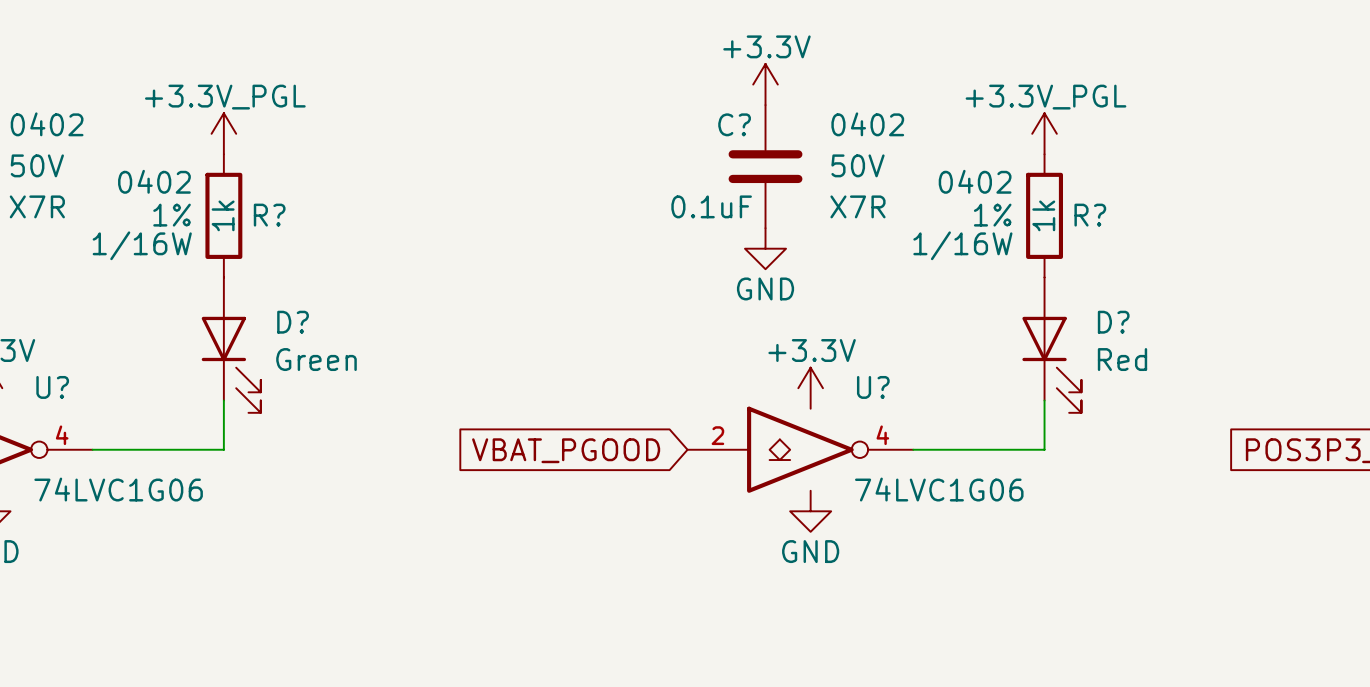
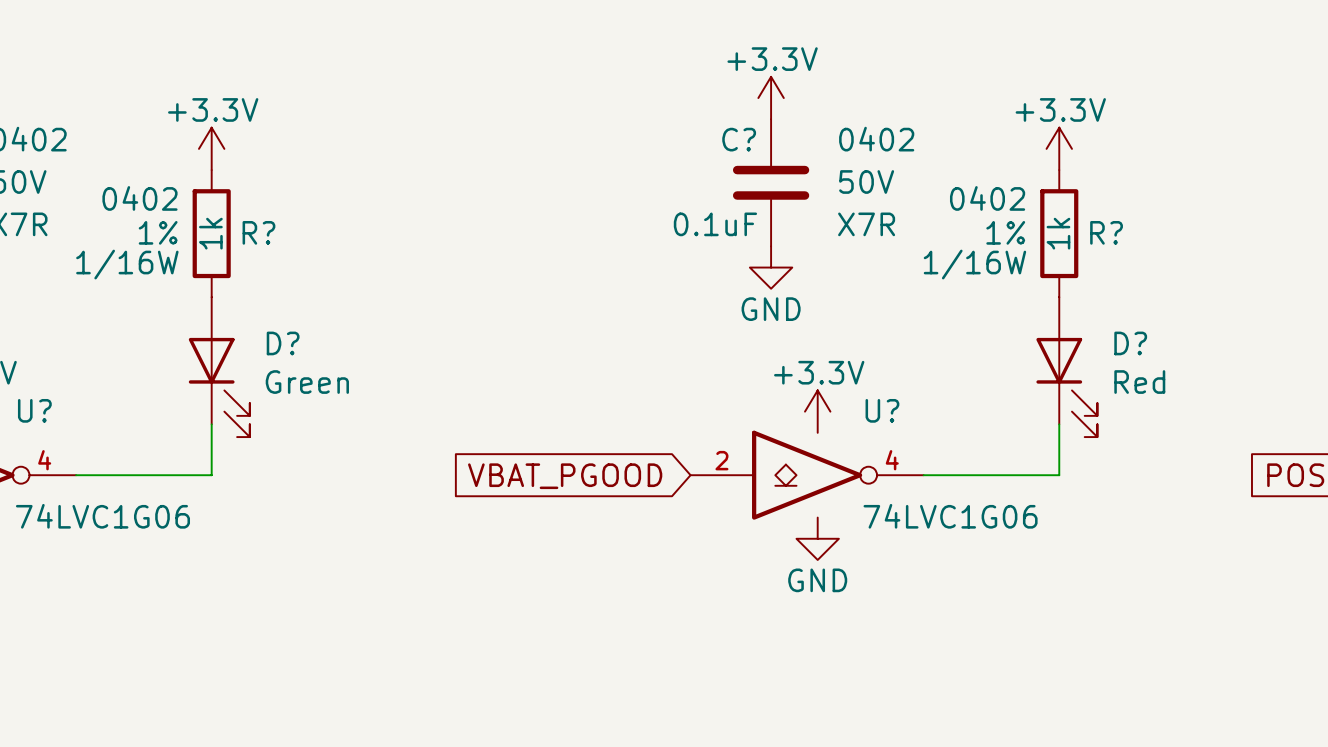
power symbol: +3.3V_PGL (223, 133) -> +3.3V (211, 148)
power symbol: +3.3V_PGL (1044, 133) -> +3.3V (1059, 148)

